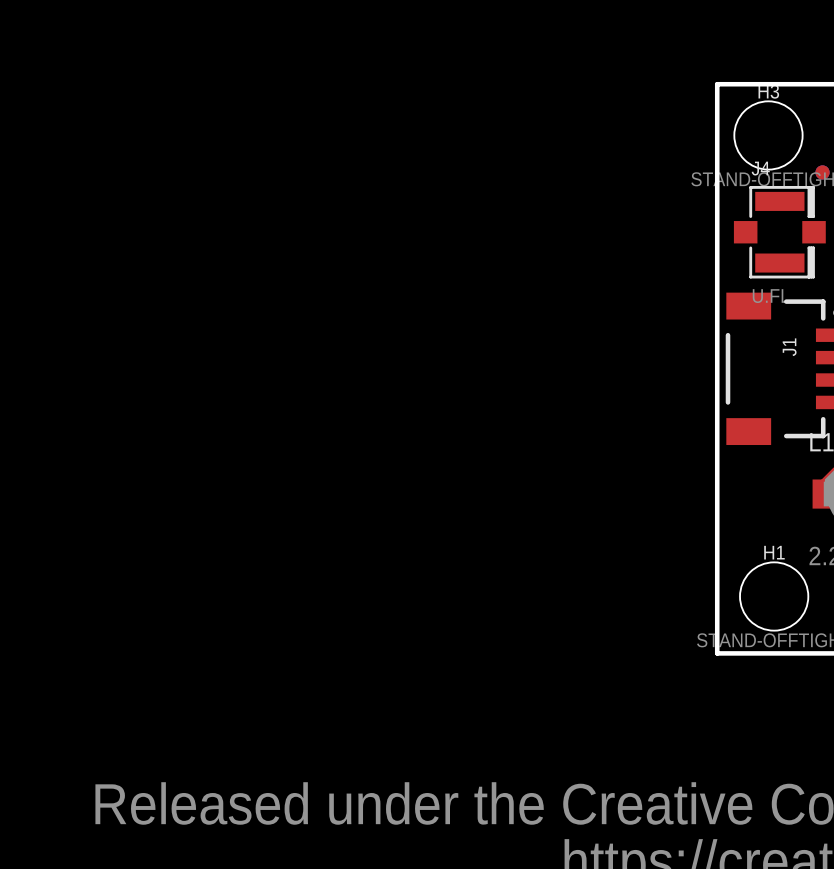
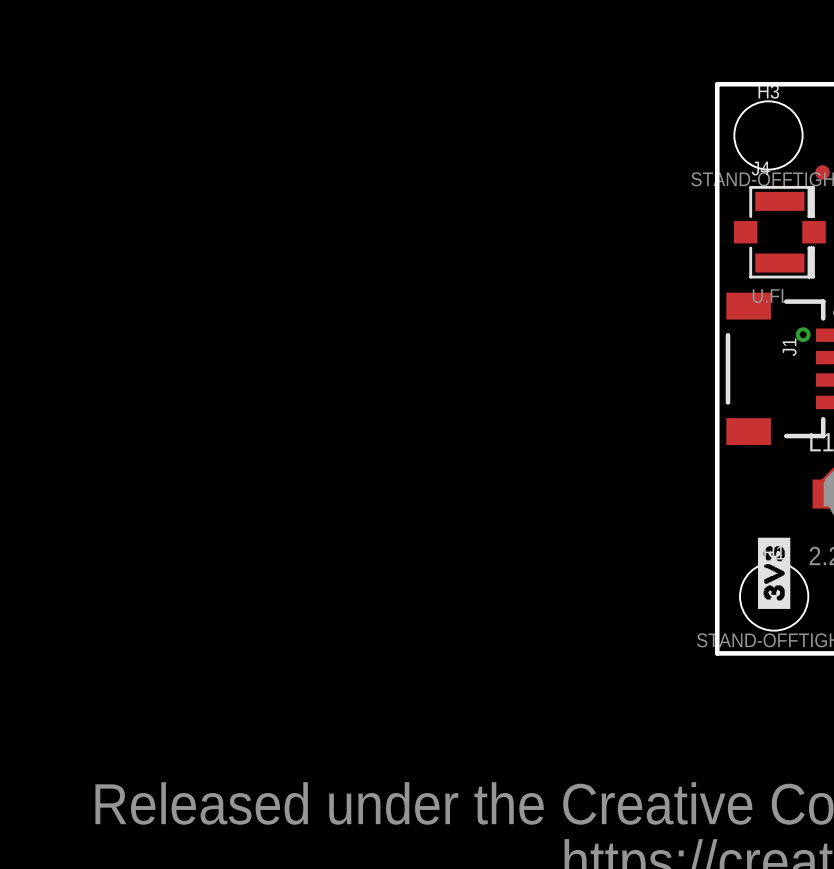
via: none -> (803, 334)
drawing: none -> [758, 537, 791, 609]

